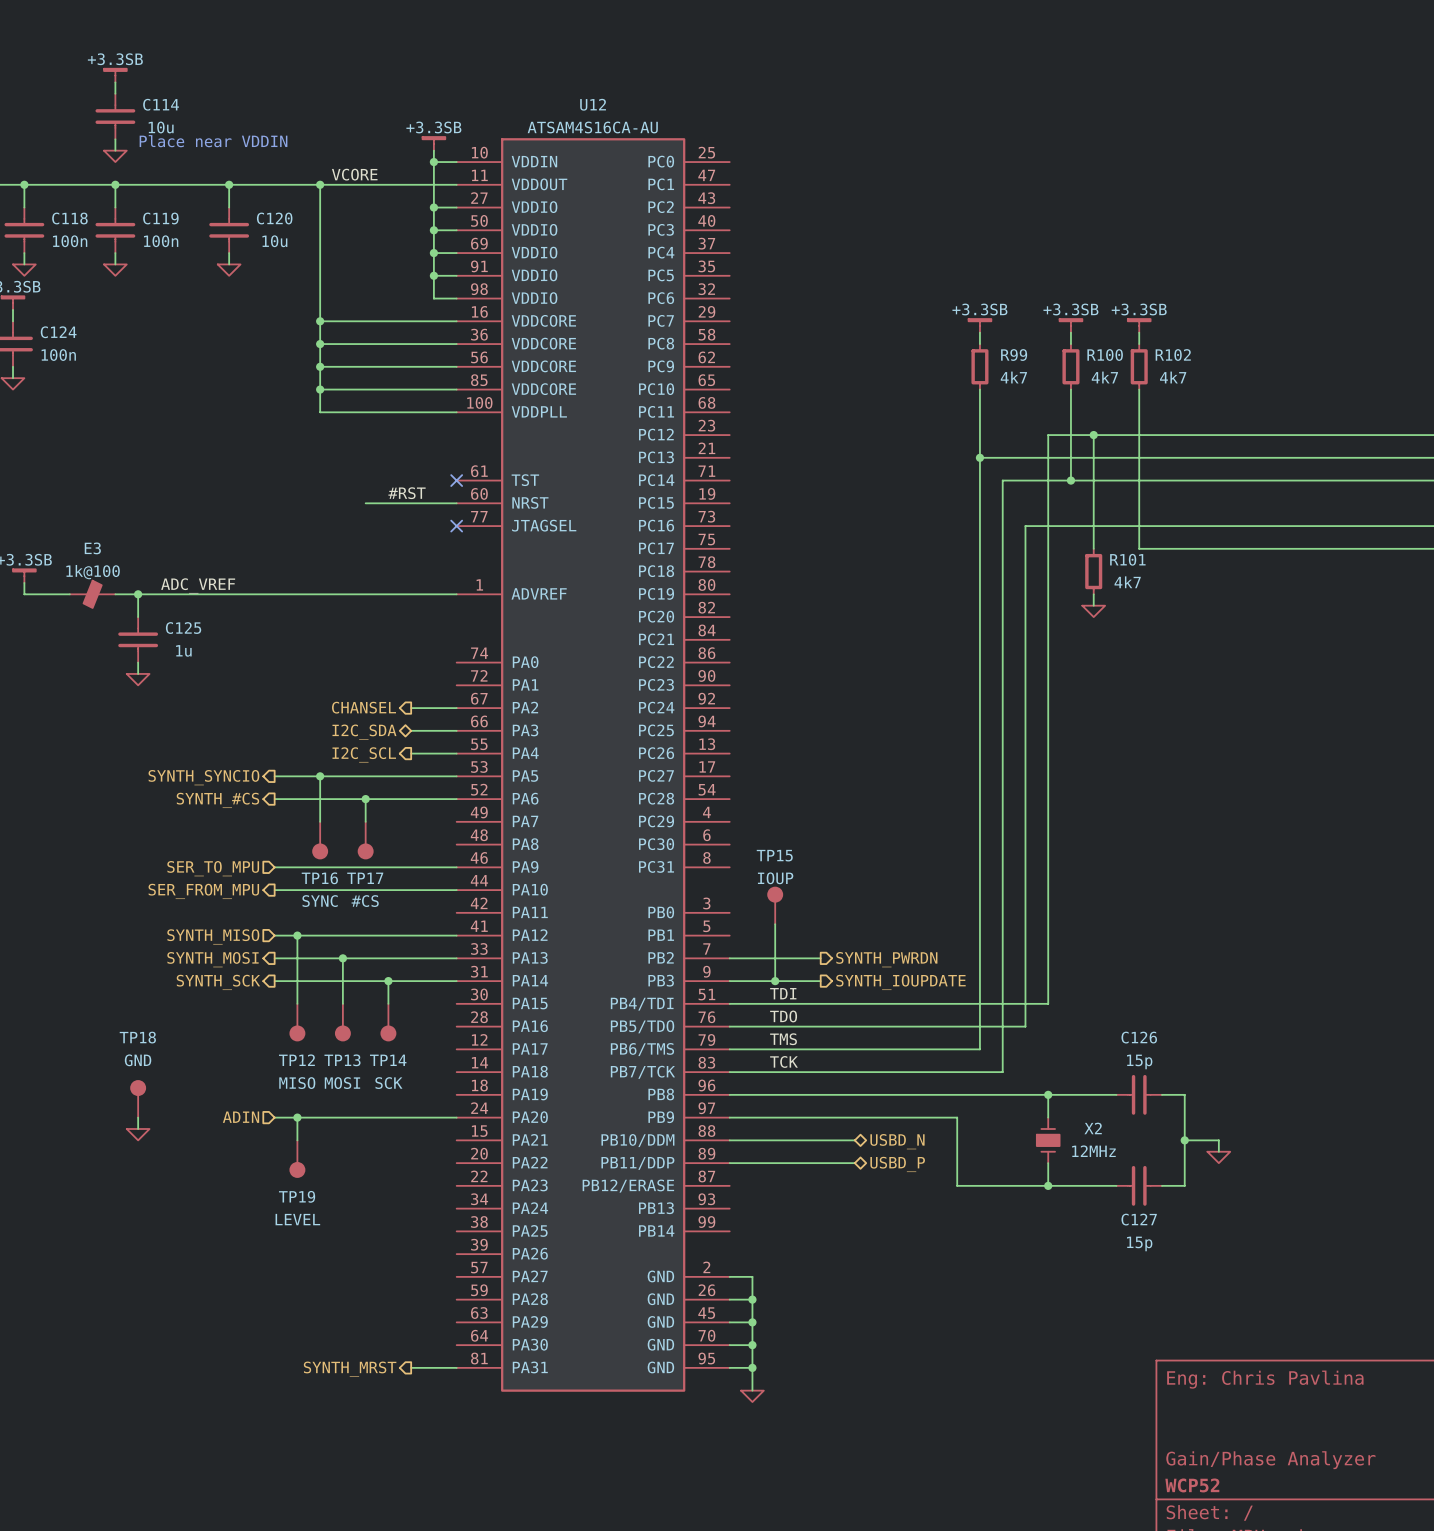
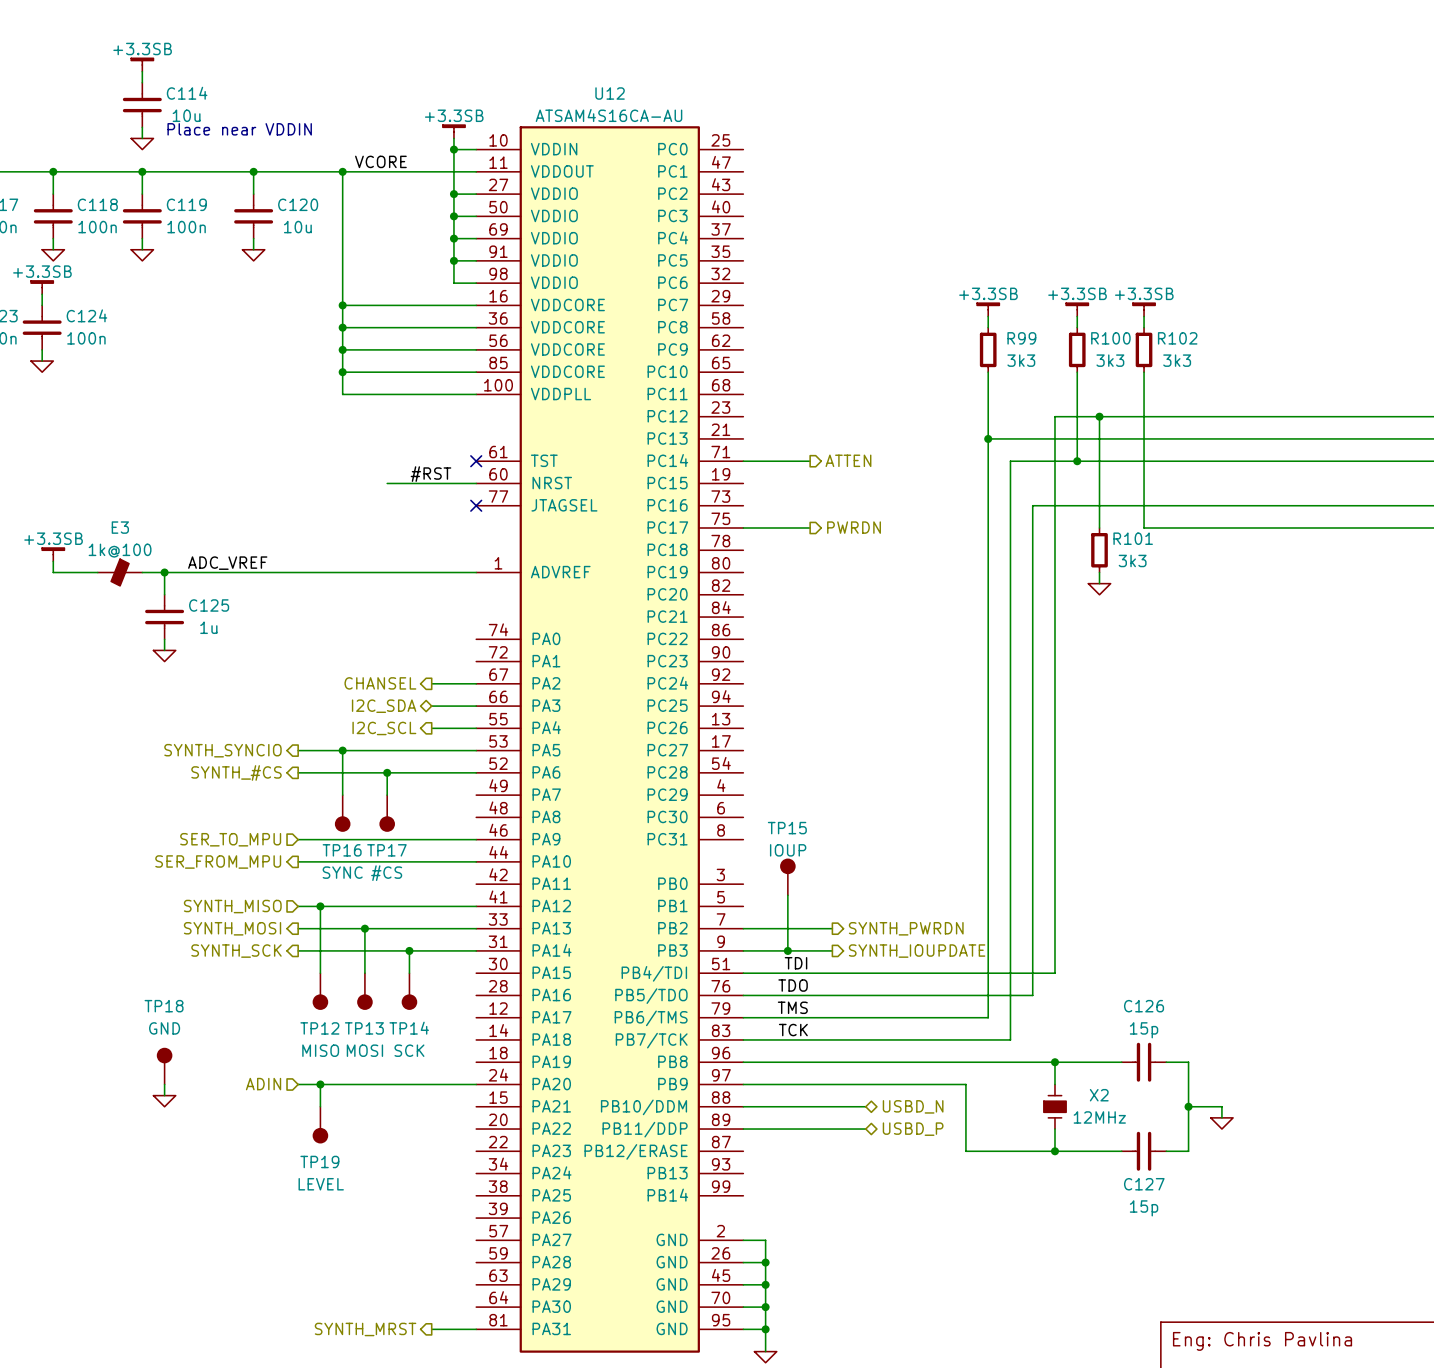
R99 value: 4k7 (1013, 377) -> 3k3 (1021, 360)
R100 value: 4k7 (1104, 377) -> 3k3 (1110, 360)
R102 value: 4k7 (1173, 377) -> 3k3 (1177, 360)
wire: none -> (743, 461) (810, 461)
hierarchical label: none -> ATTEN (848, 460)
wire: none -> (743, 527) (810, 527)
hierarchical label: none -> PWRDN (854, 527)
R101 value: 4k7 (1127, 582) -> 3k3 (1132, 560)

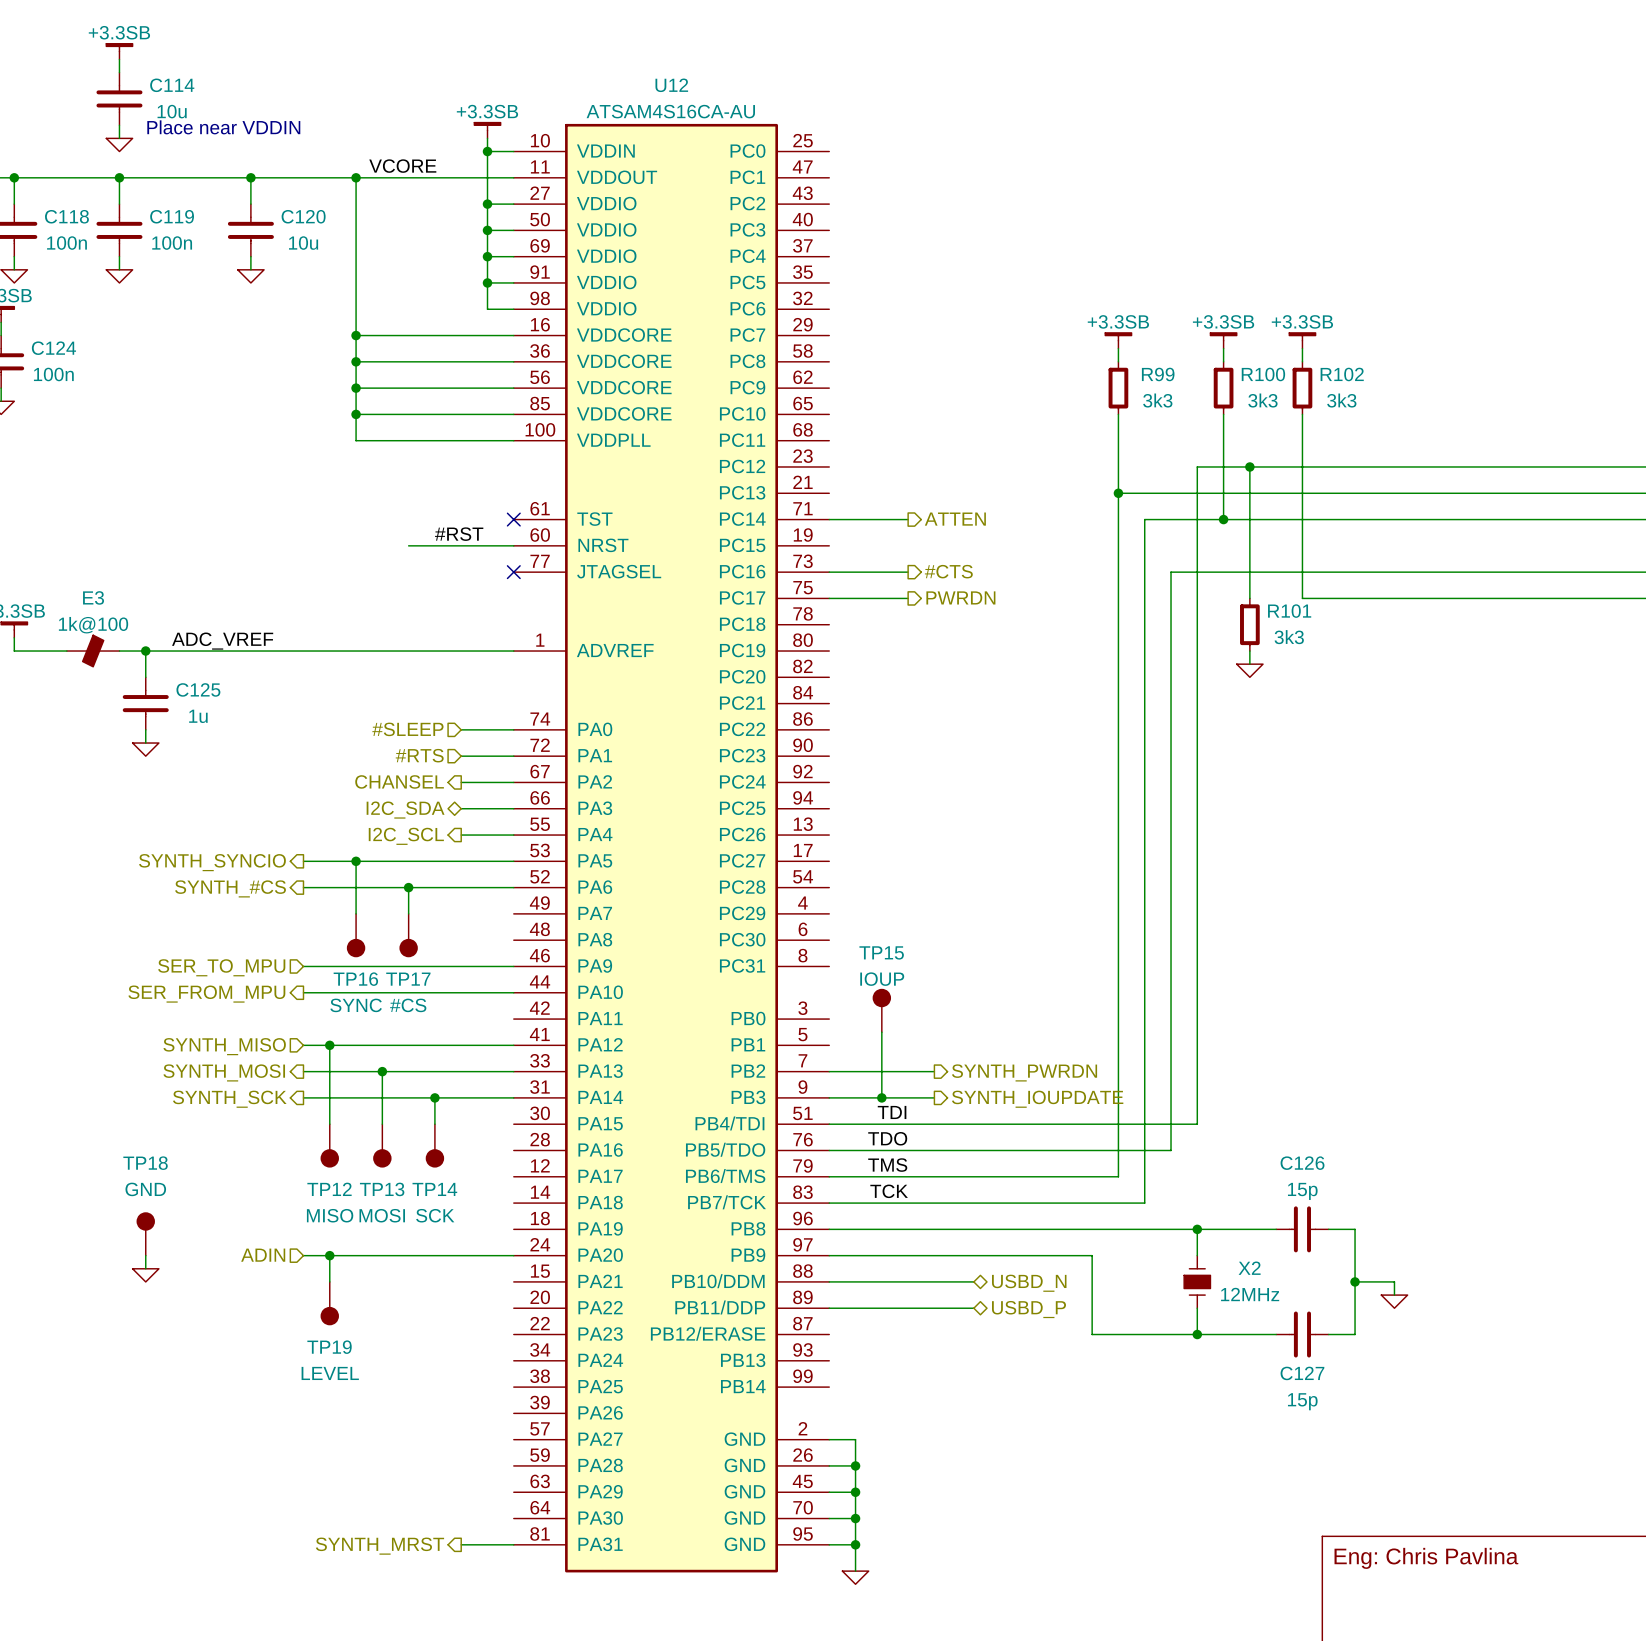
wire: none -> (829, 572) (908, 572)
hierarchical label: none -> #CTS (948, 571)
hierarchical label: none -> #SLEEP (407, 729)
wire: none -> (461, 729) (513, 729)
hierarchical label: none -> #RTS (419, 755)
wire: none -> (461, 756) (513, 756)

